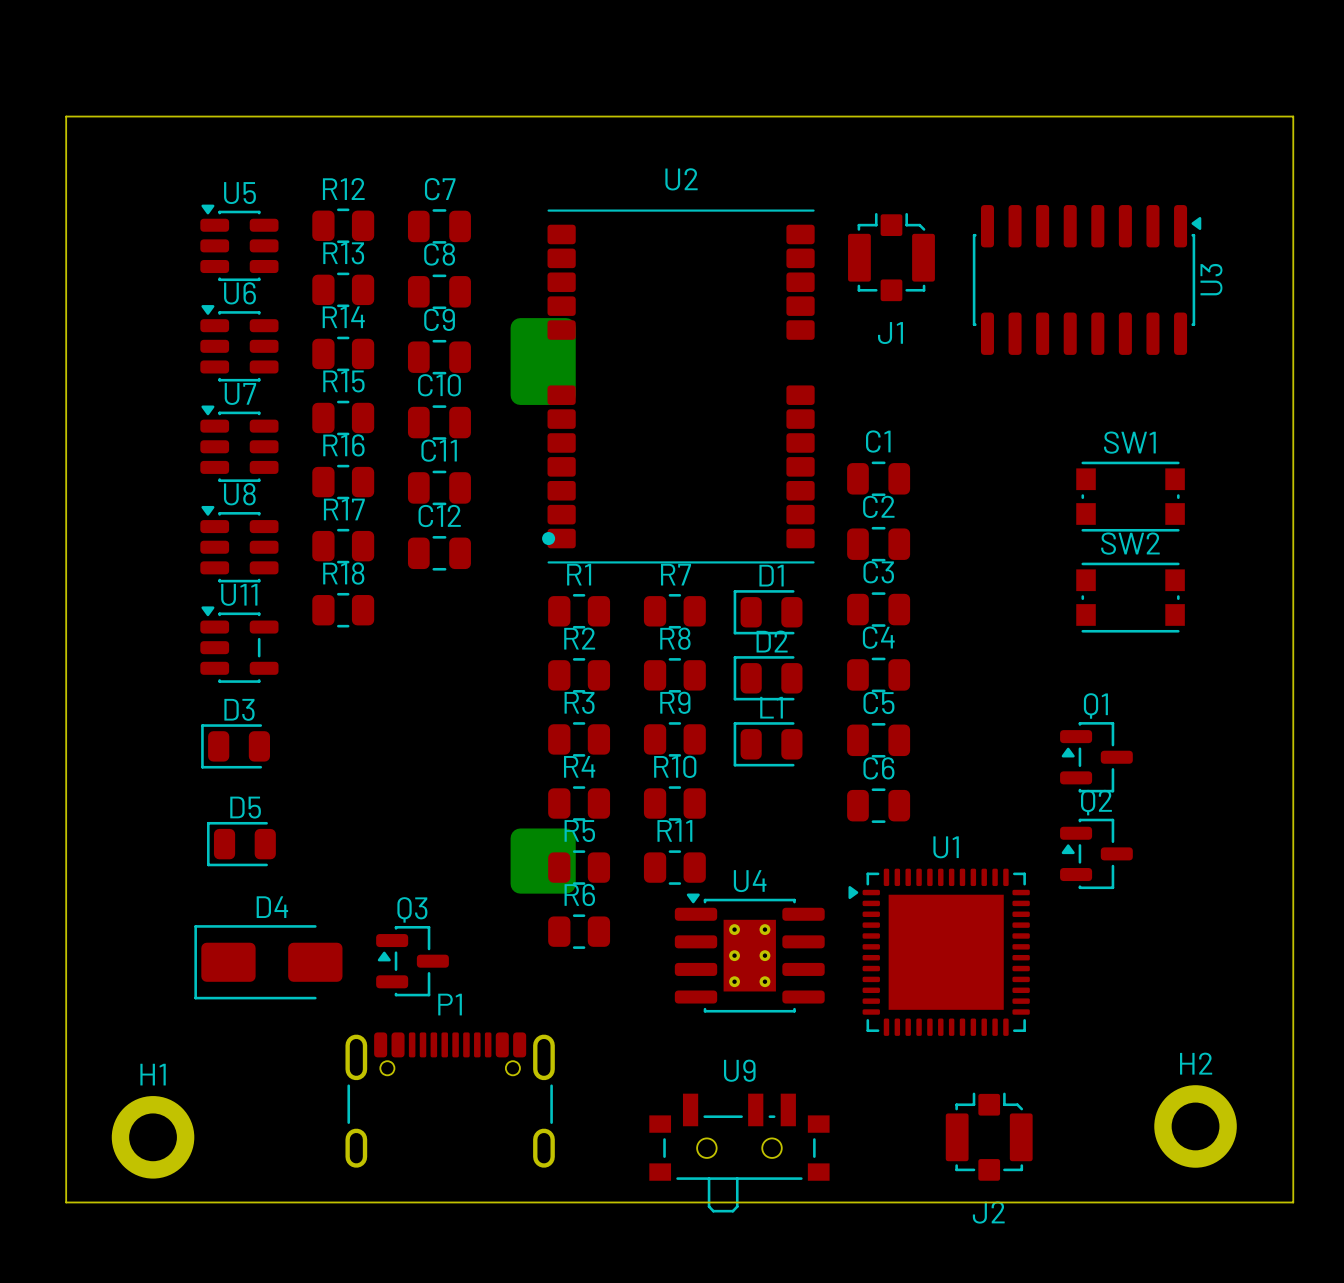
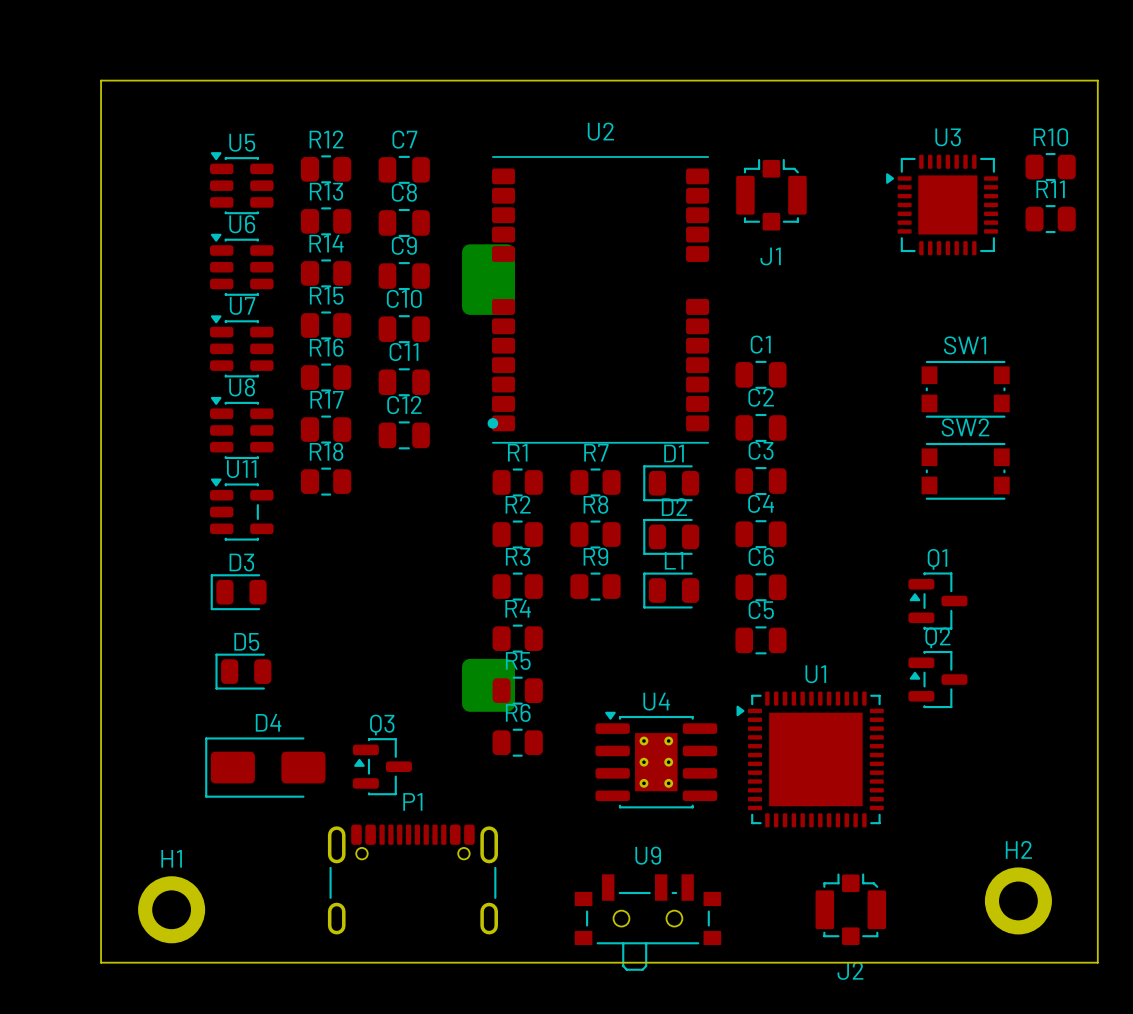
U3 footprint: [972, 205, 1202, 355] -> [886, 154, 999, 256]
U3 name position: U3 (1211, 279) -> U3 (948, 137)
C5 name: C5 (878, 703) -> C6 (761, 556)
C6 name: C6 (878, 768) -> C5 (761, 610)
R10 position: (674, 803) -> (1050, 167)
R11 position: (674, 867) -> (1050, 219)

